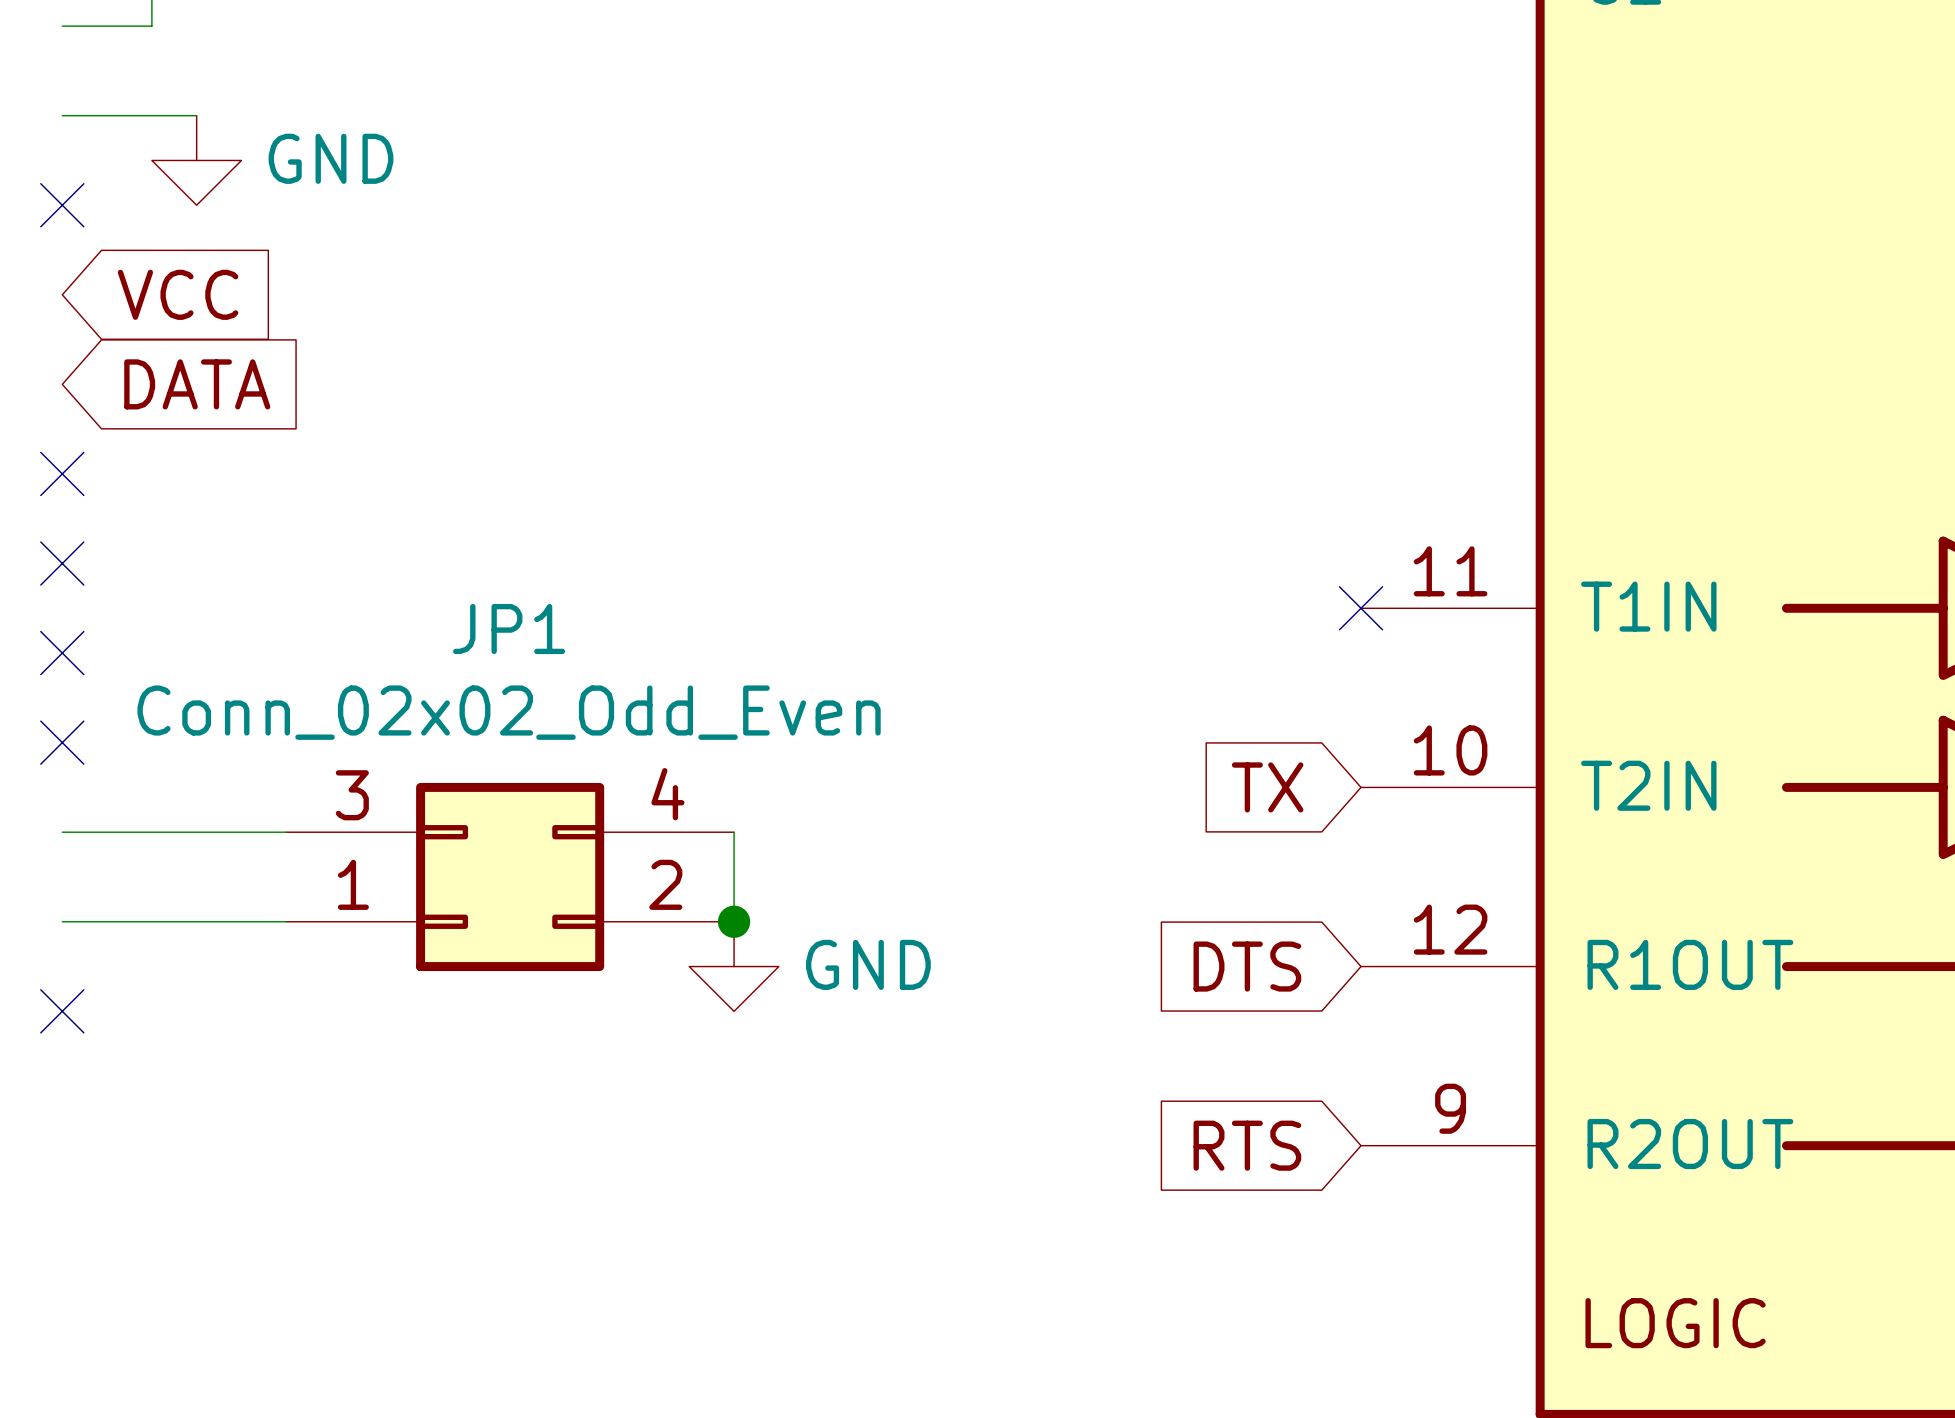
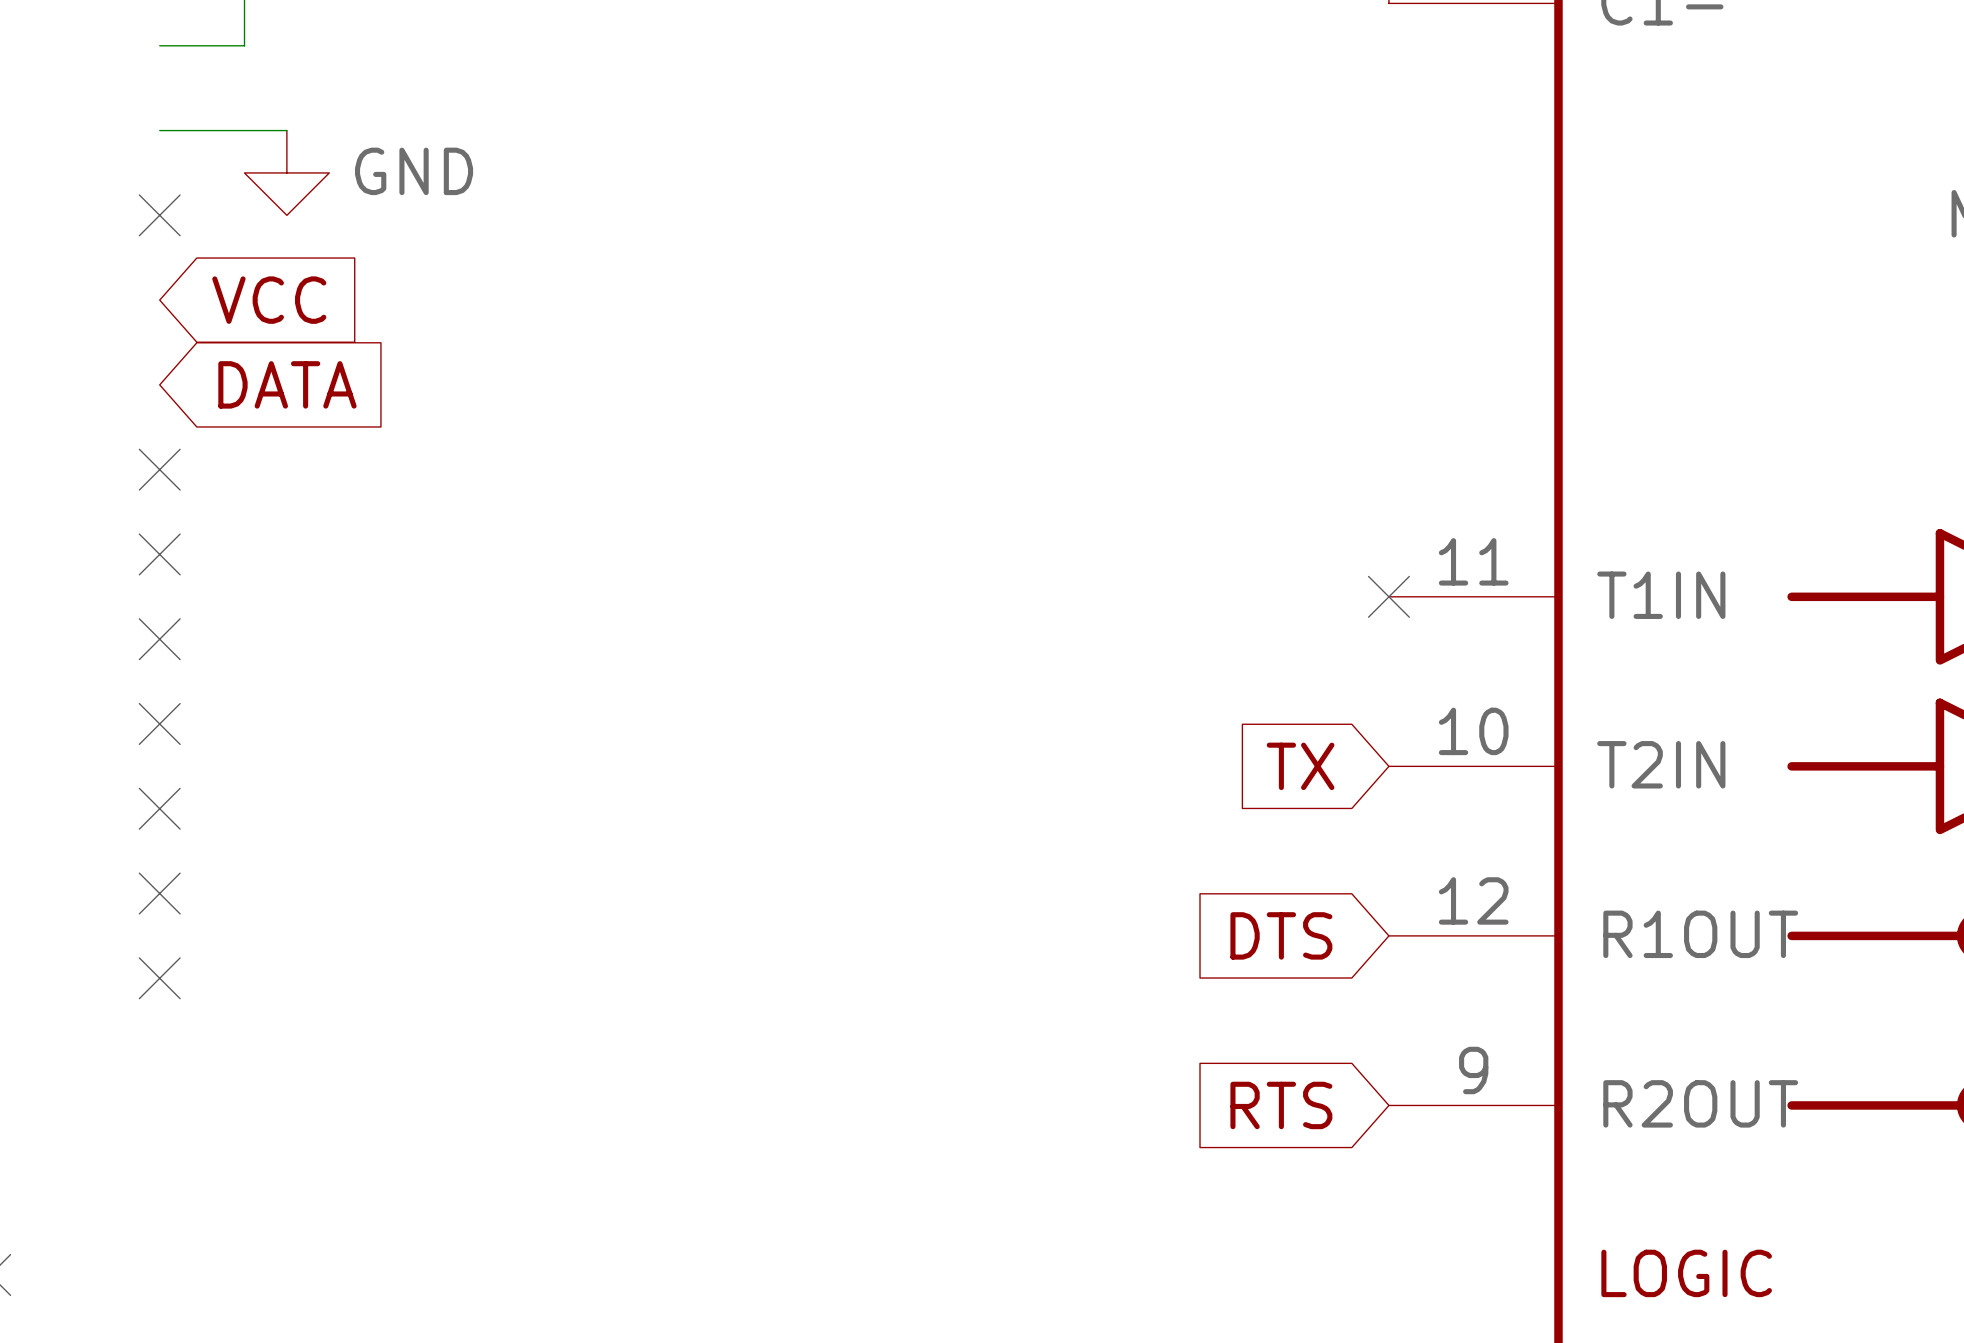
wire: (62, 832) (286, 832) -> none
no-connect mark: none -> (159, 808)
wire: (734, 832) (734, 921) -> none
JP1: Conn_02x02_Odd_Even (510, 876) -> none
wire: (62, 921) (286, 921) -> none
no-connect mark: none -> (159, 893)
junction: (734, 921) -> none
power symbol: GND (734, 966) -> none

